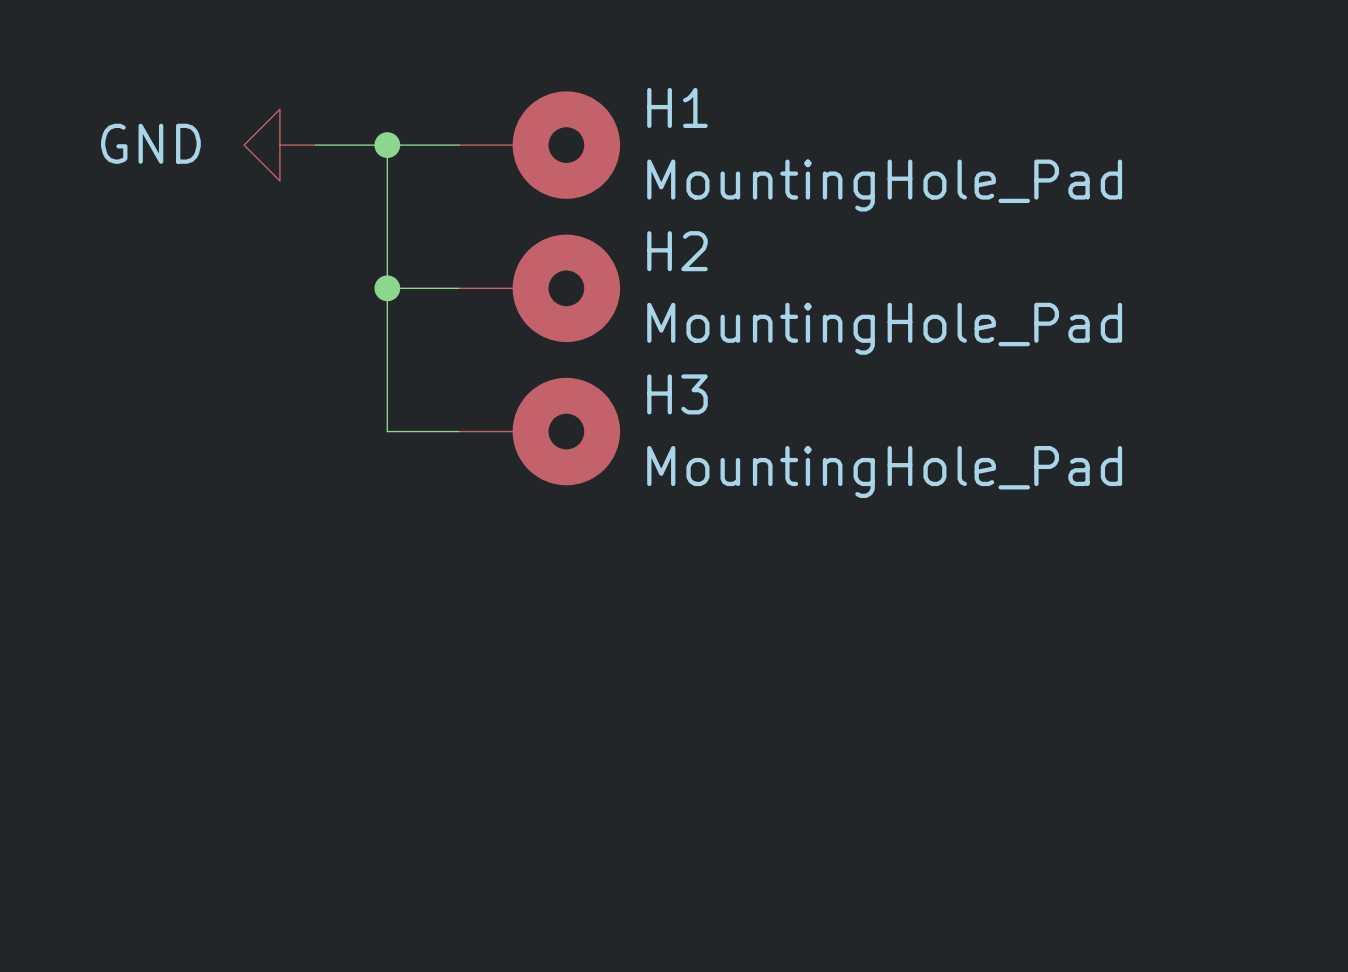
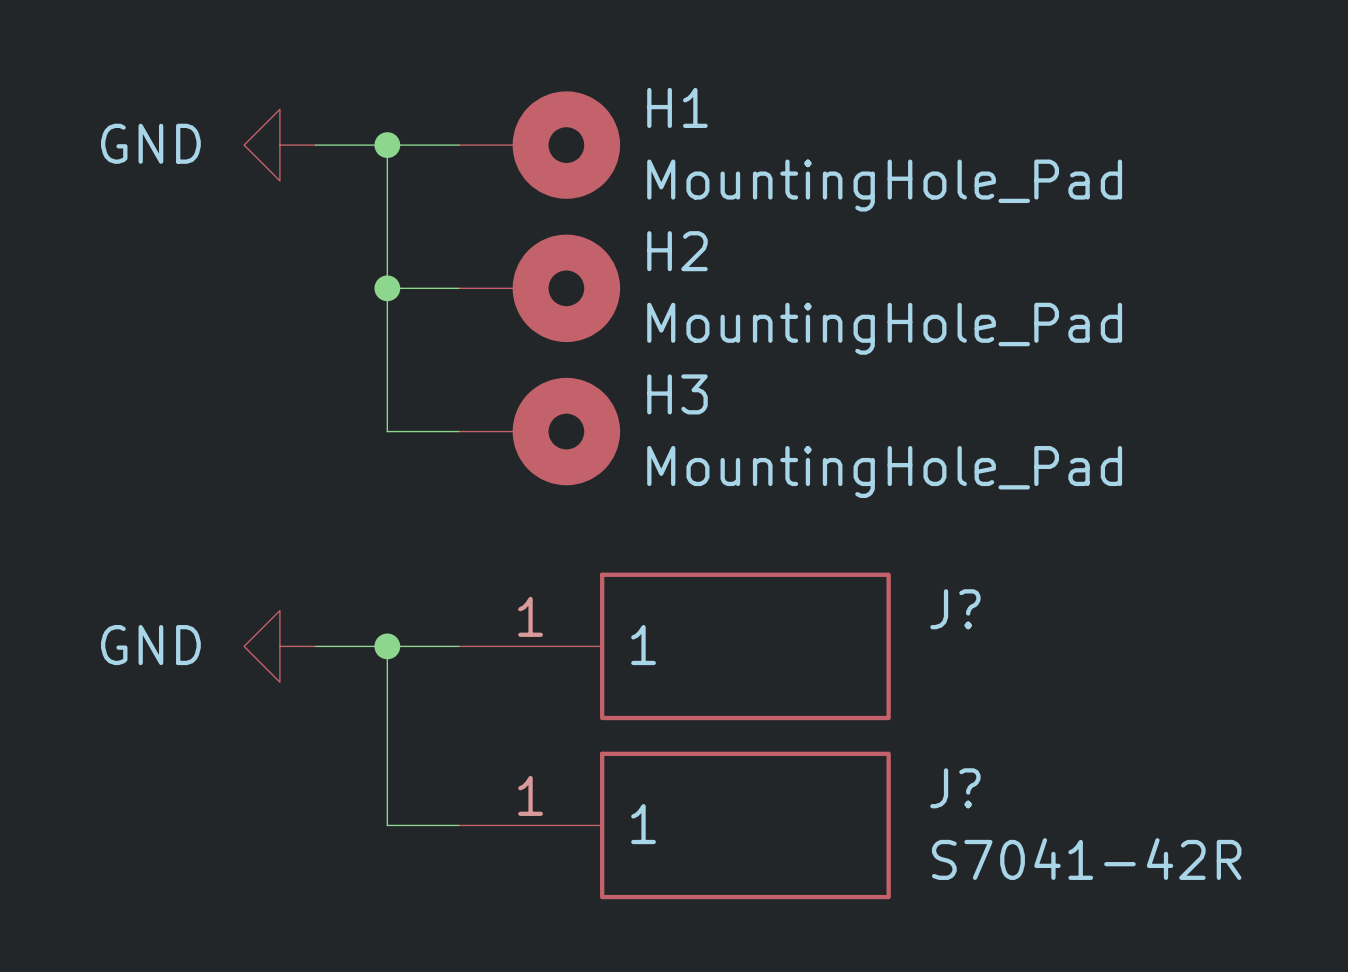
power symbol: none -> GND (279, 646)
wire: none -> (315, 646) (458, 646)
wire: none -> (387, 646) (387, 825) (458, 825)
junction: none -> (387, 646)
J?: none -> (674, 646)
J?: none -> S7041-42R (674, 825)

